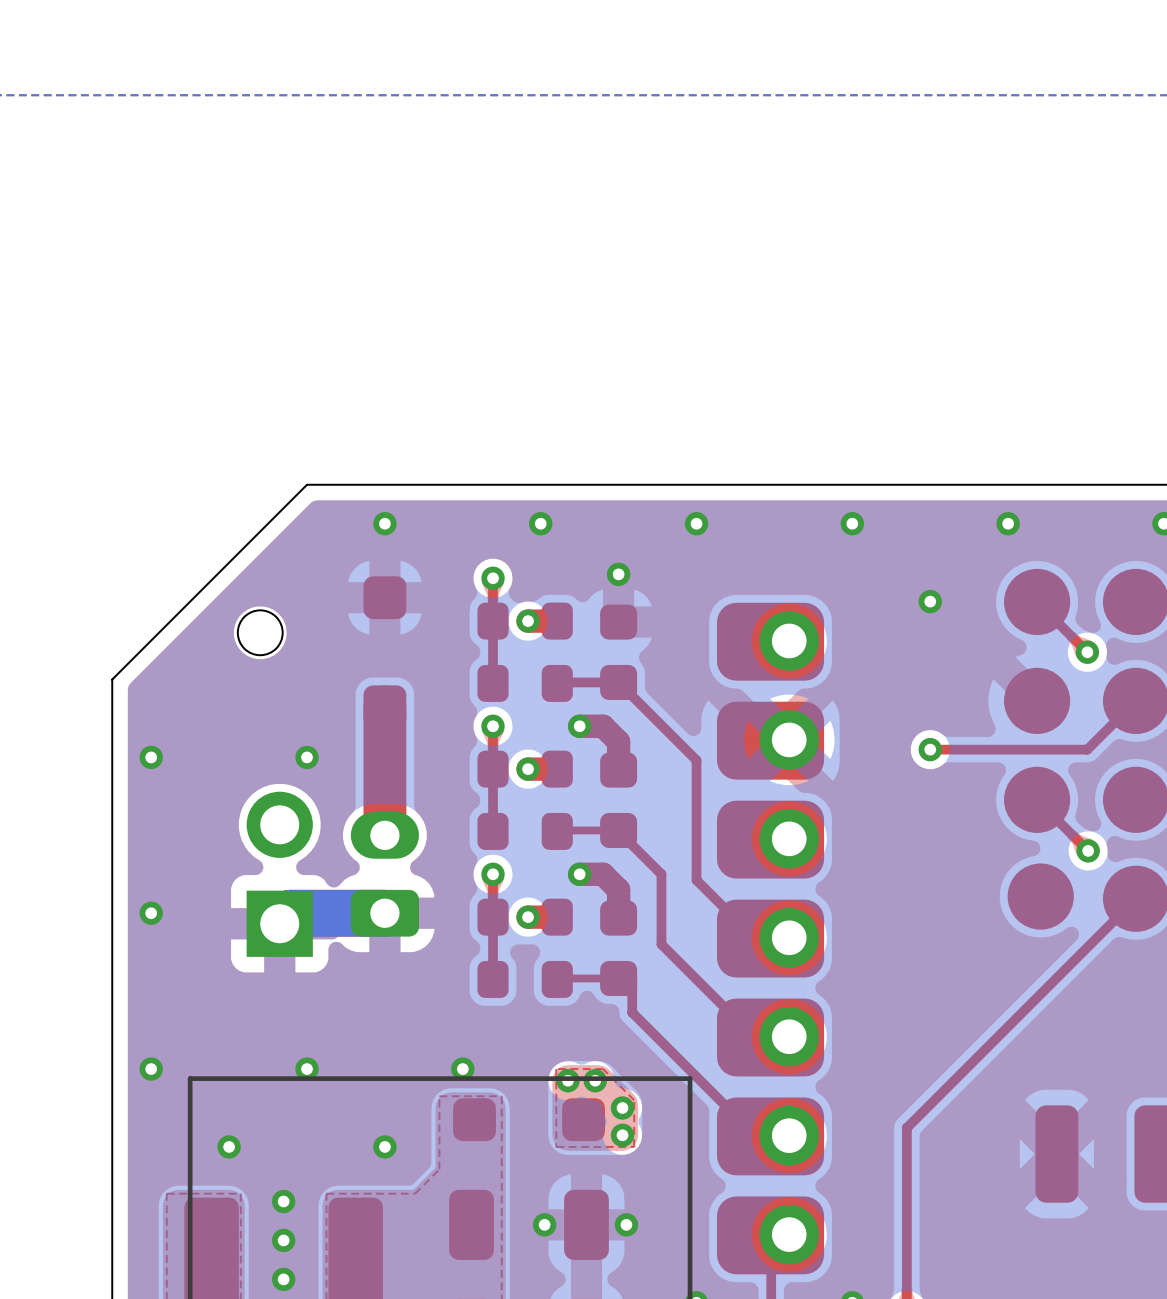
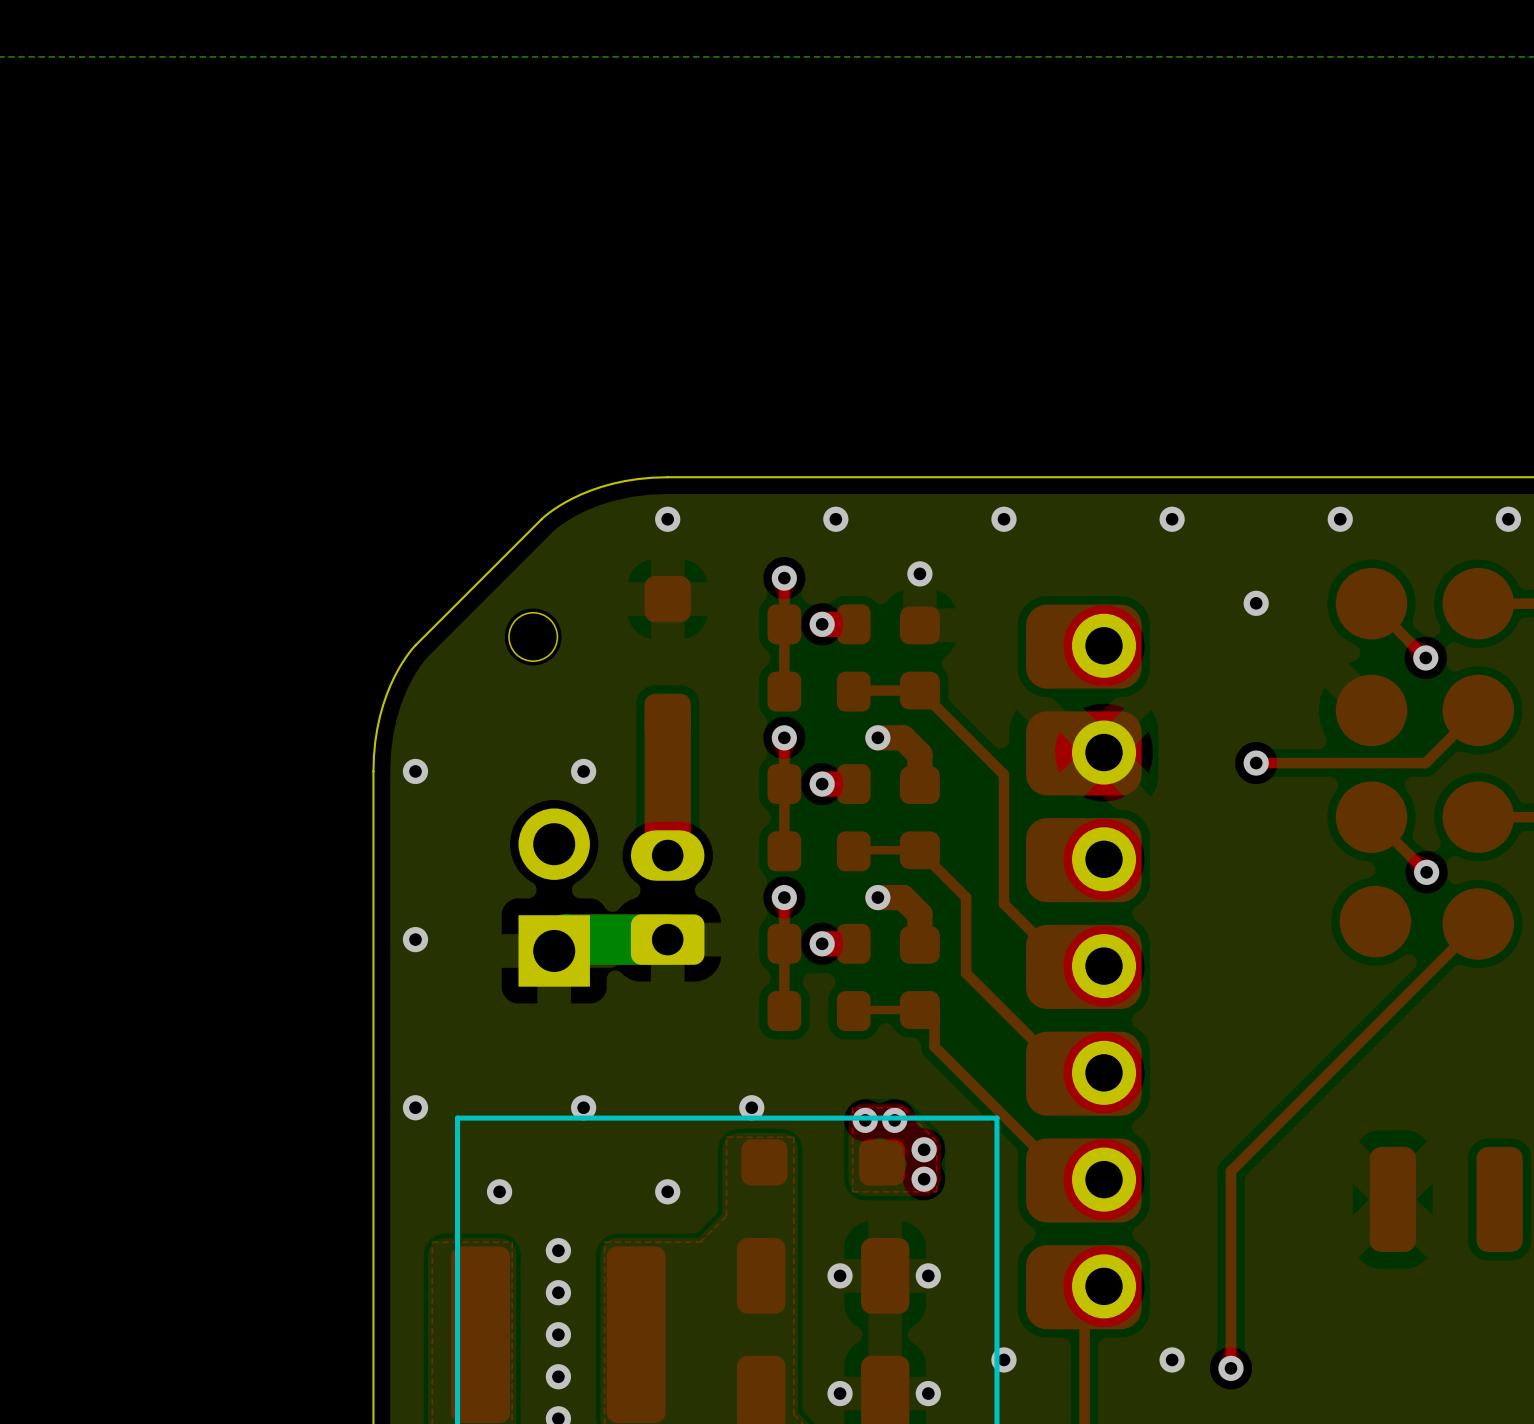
board edge: (384, 484) (307, 484) (268, 523) -> (667, 477) (638, 479) (601, 486) (565, 502) (541, 519)
board edge: (151, 640) (112, 679) (112, 757) -> (415, 645) (398, 669) (383, 704) (375, 741) (373, 771)

